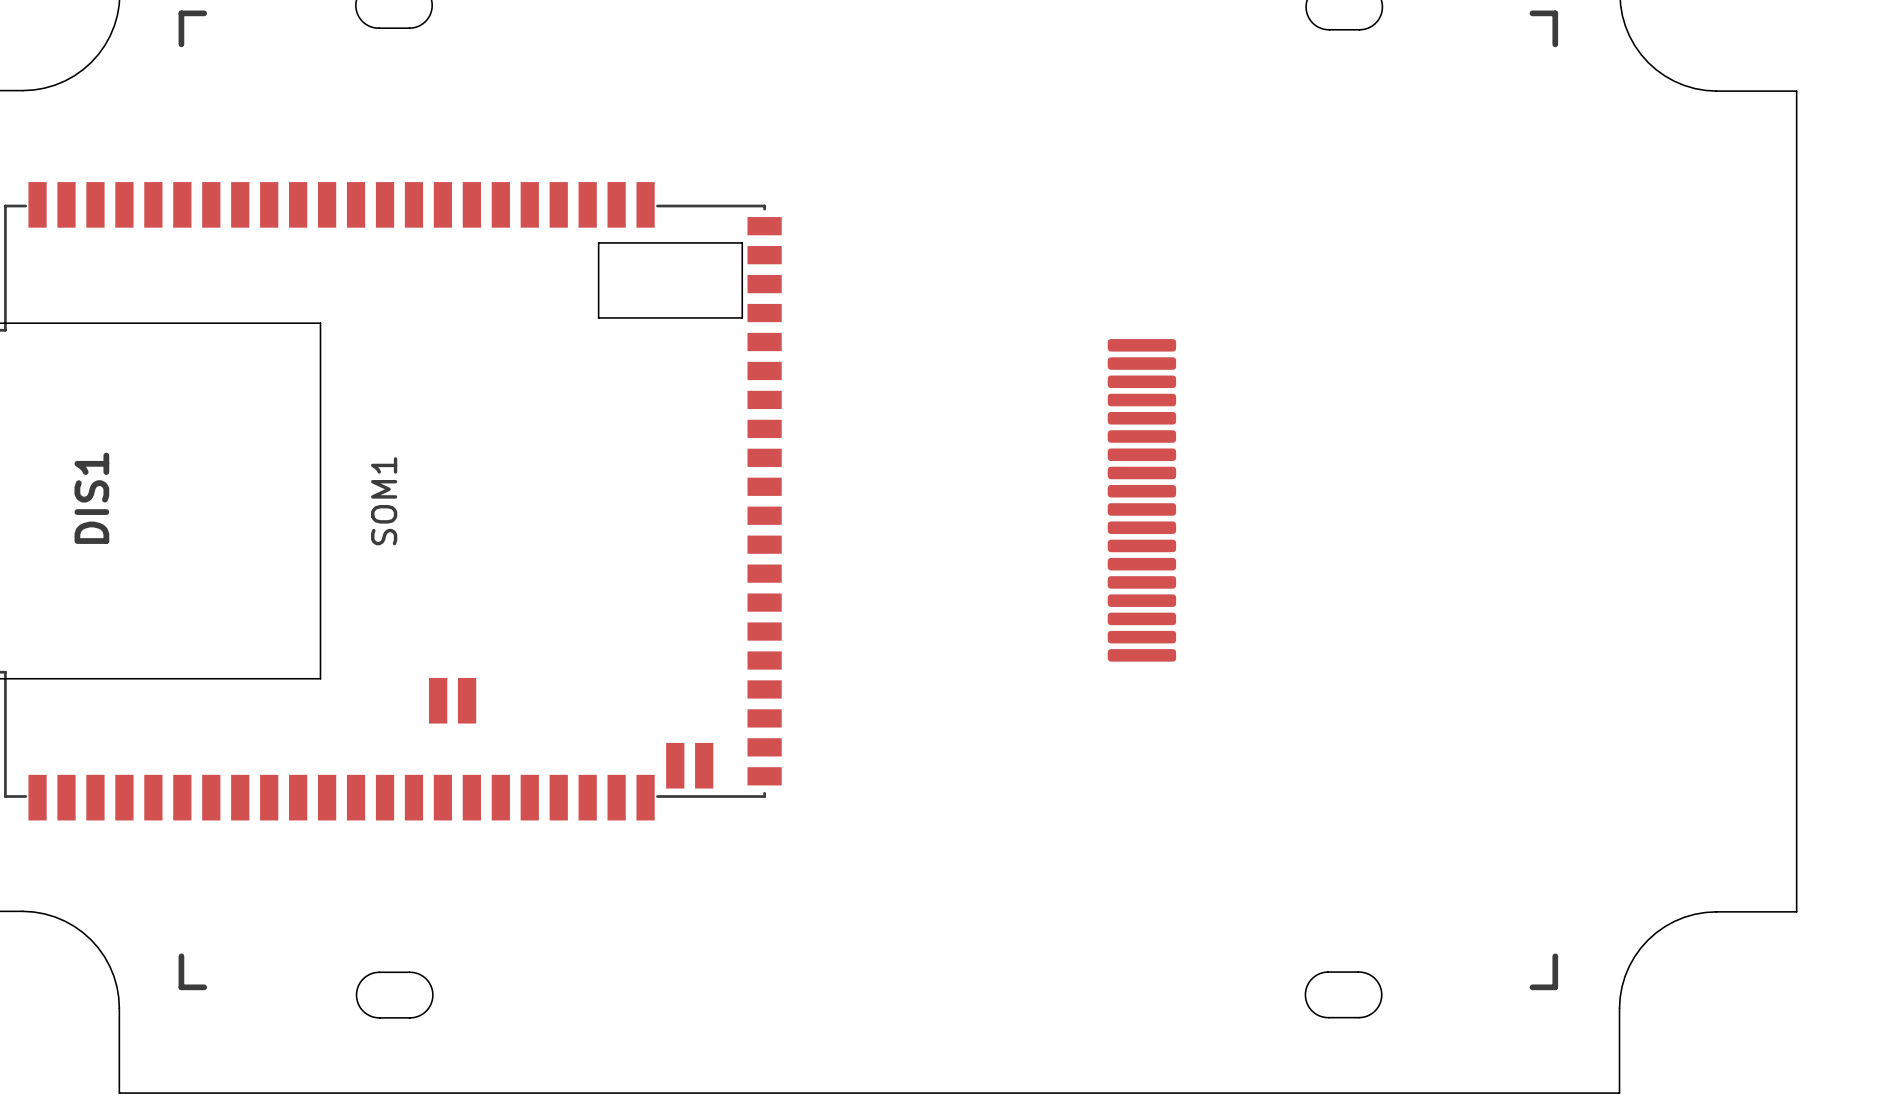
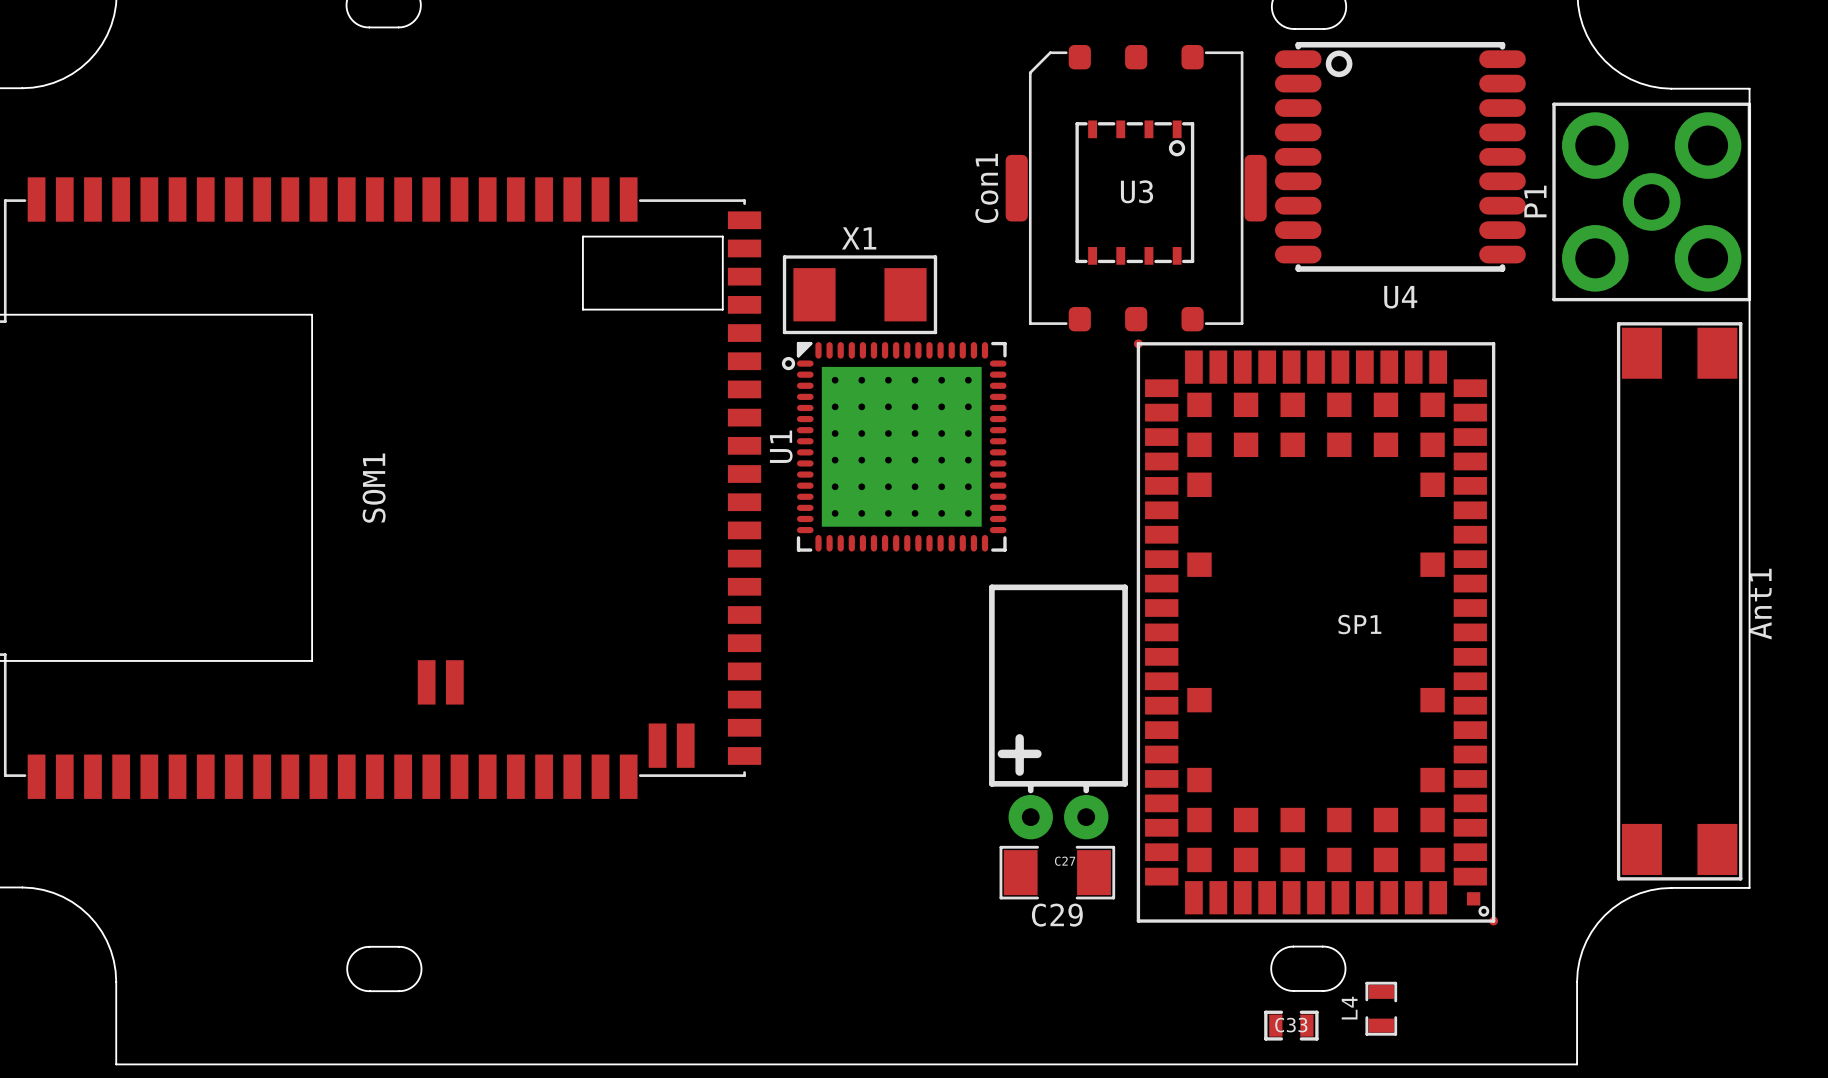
U4: none -> (1400, 156)
Con1: none -> (1136, 188)
U3: none -> (1134, 192)
P1: none -> (1651, 201)
X1: none -> (860, 294)
U1: none -> (894, 446)
DIS1: (868, 500) -> none
Ant1: none -> (1679, 601)
SP1: none -> (1316, 632)
C27: none -> (1058, 711)
C29: none -> (1057, 872)
L4: none -> (1381, 1008)
C33: none -> (1291, 1025)

